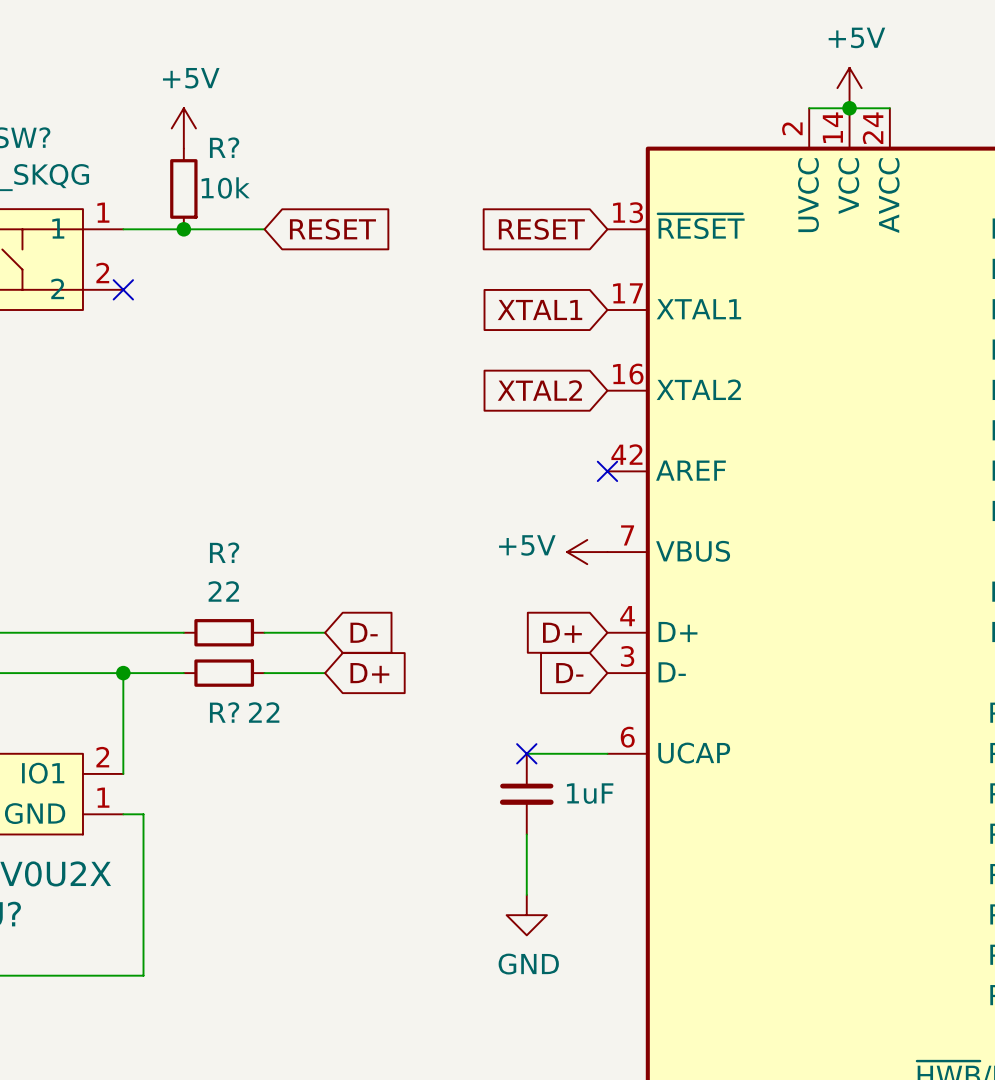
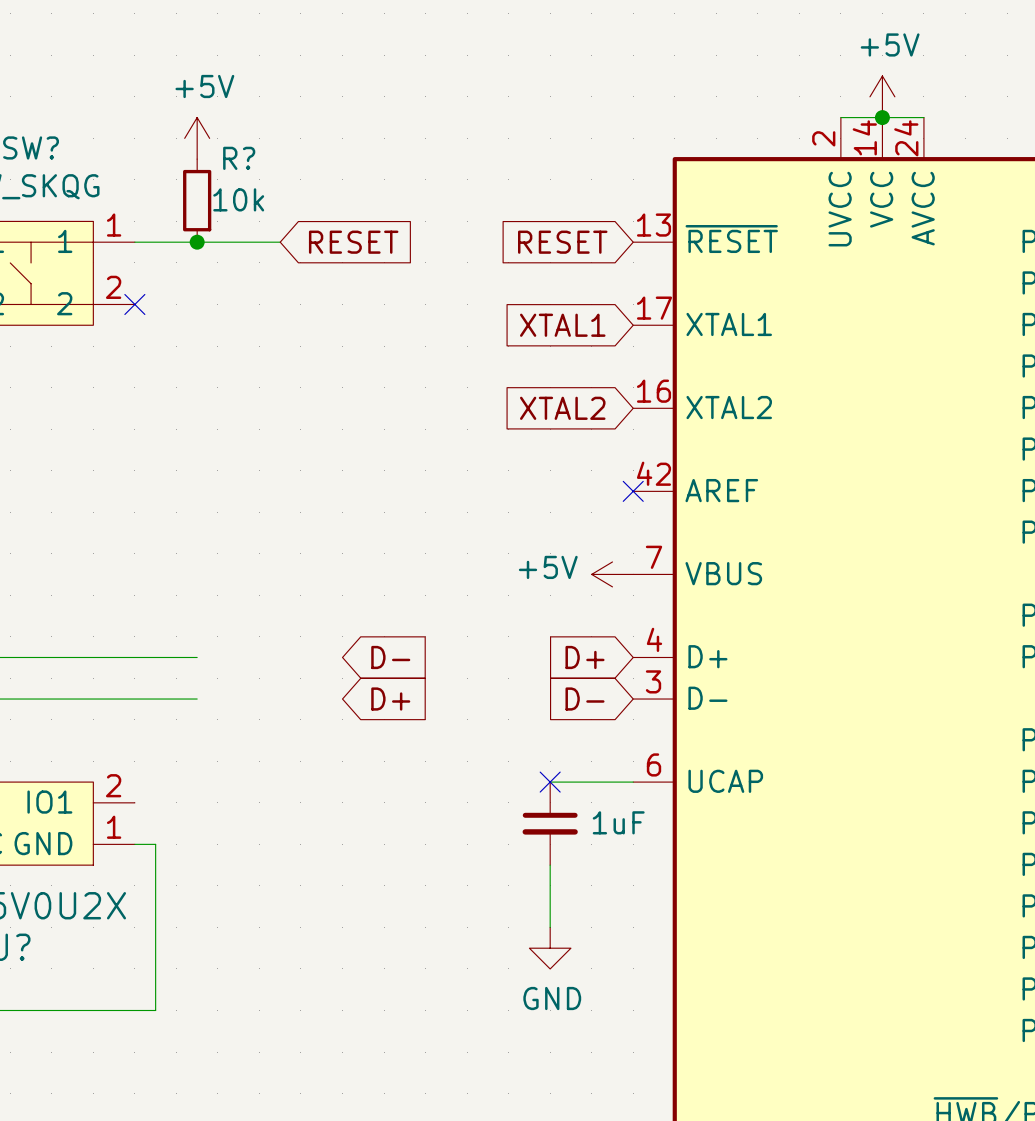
R?: 22 (224, 632) -> none
wire: (264, 632) (325, 632) -> none
wire: (123, 673) (123, 773) -> none
junction: (123, 673) -> none
R?: 22 (224, 673) -> none
wire: (264, 673) (325, 673) -> none

